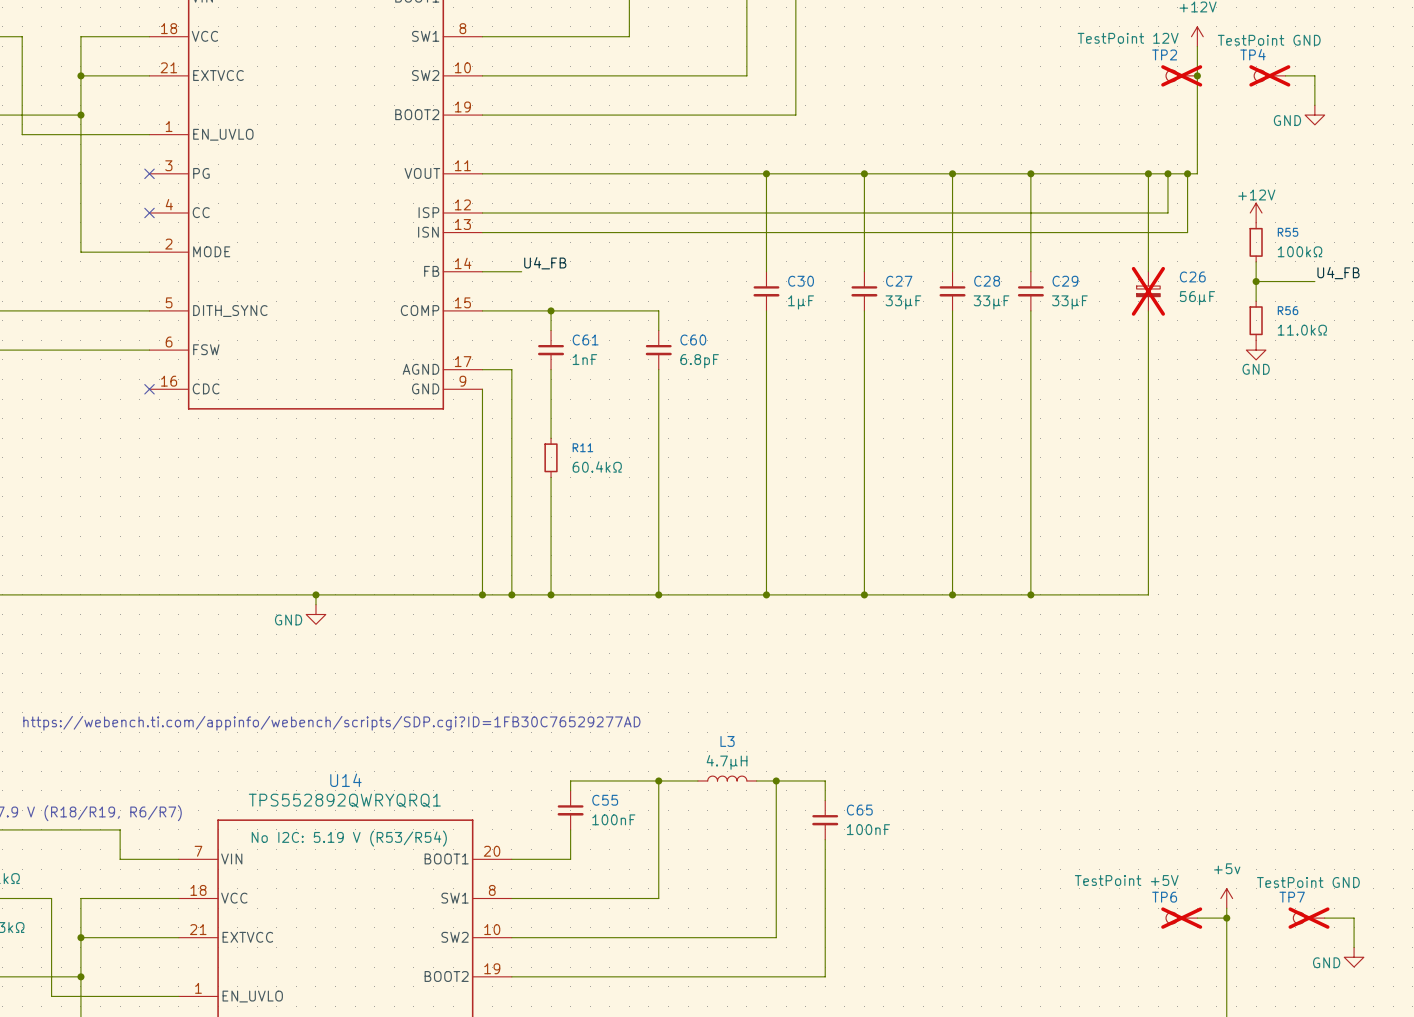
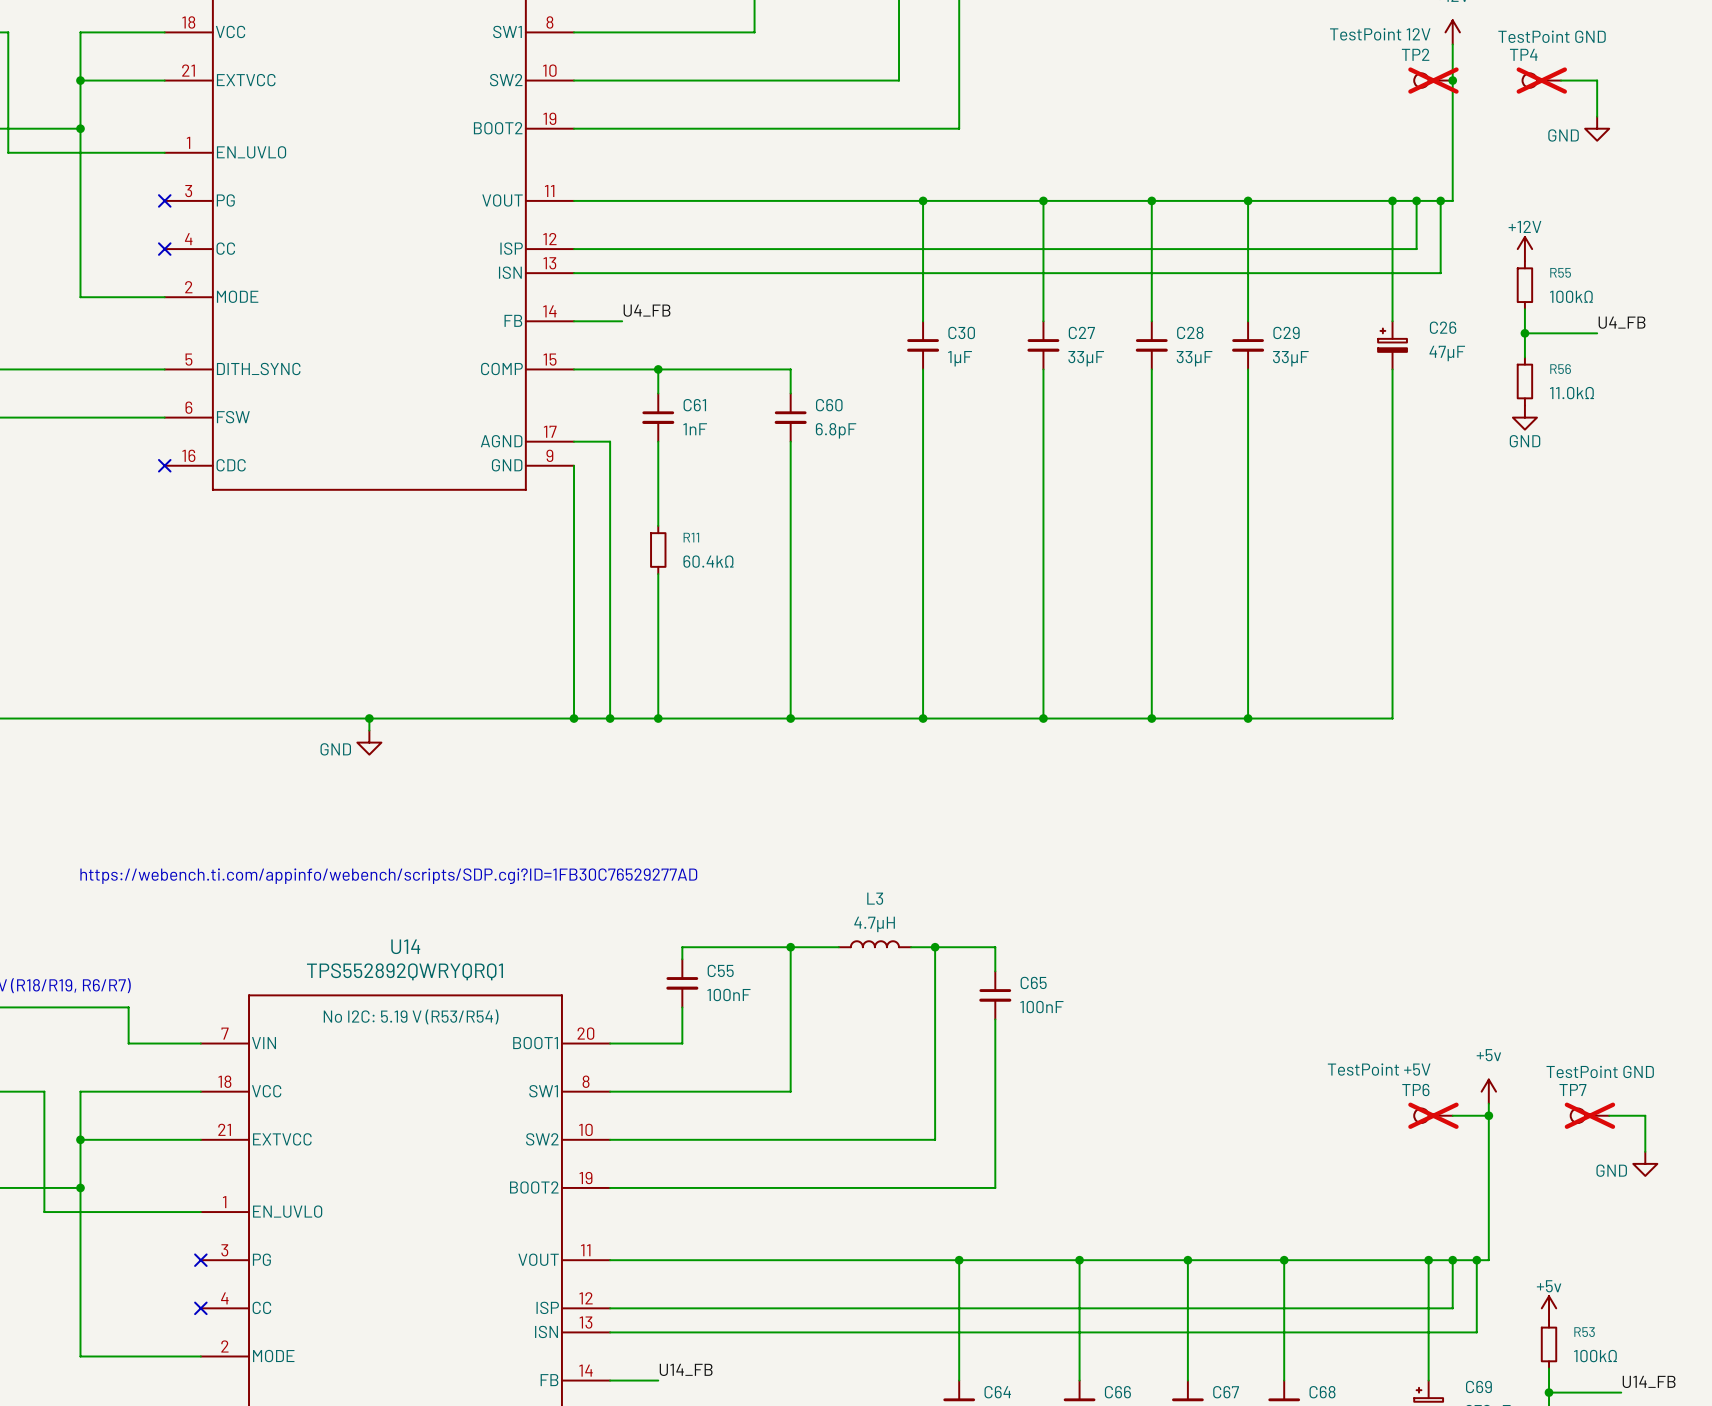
C26 do-not-place cross: (1148, 291) -> none
C26 value: 56µF (1197, 298) -> 47µF (1447, 353)

